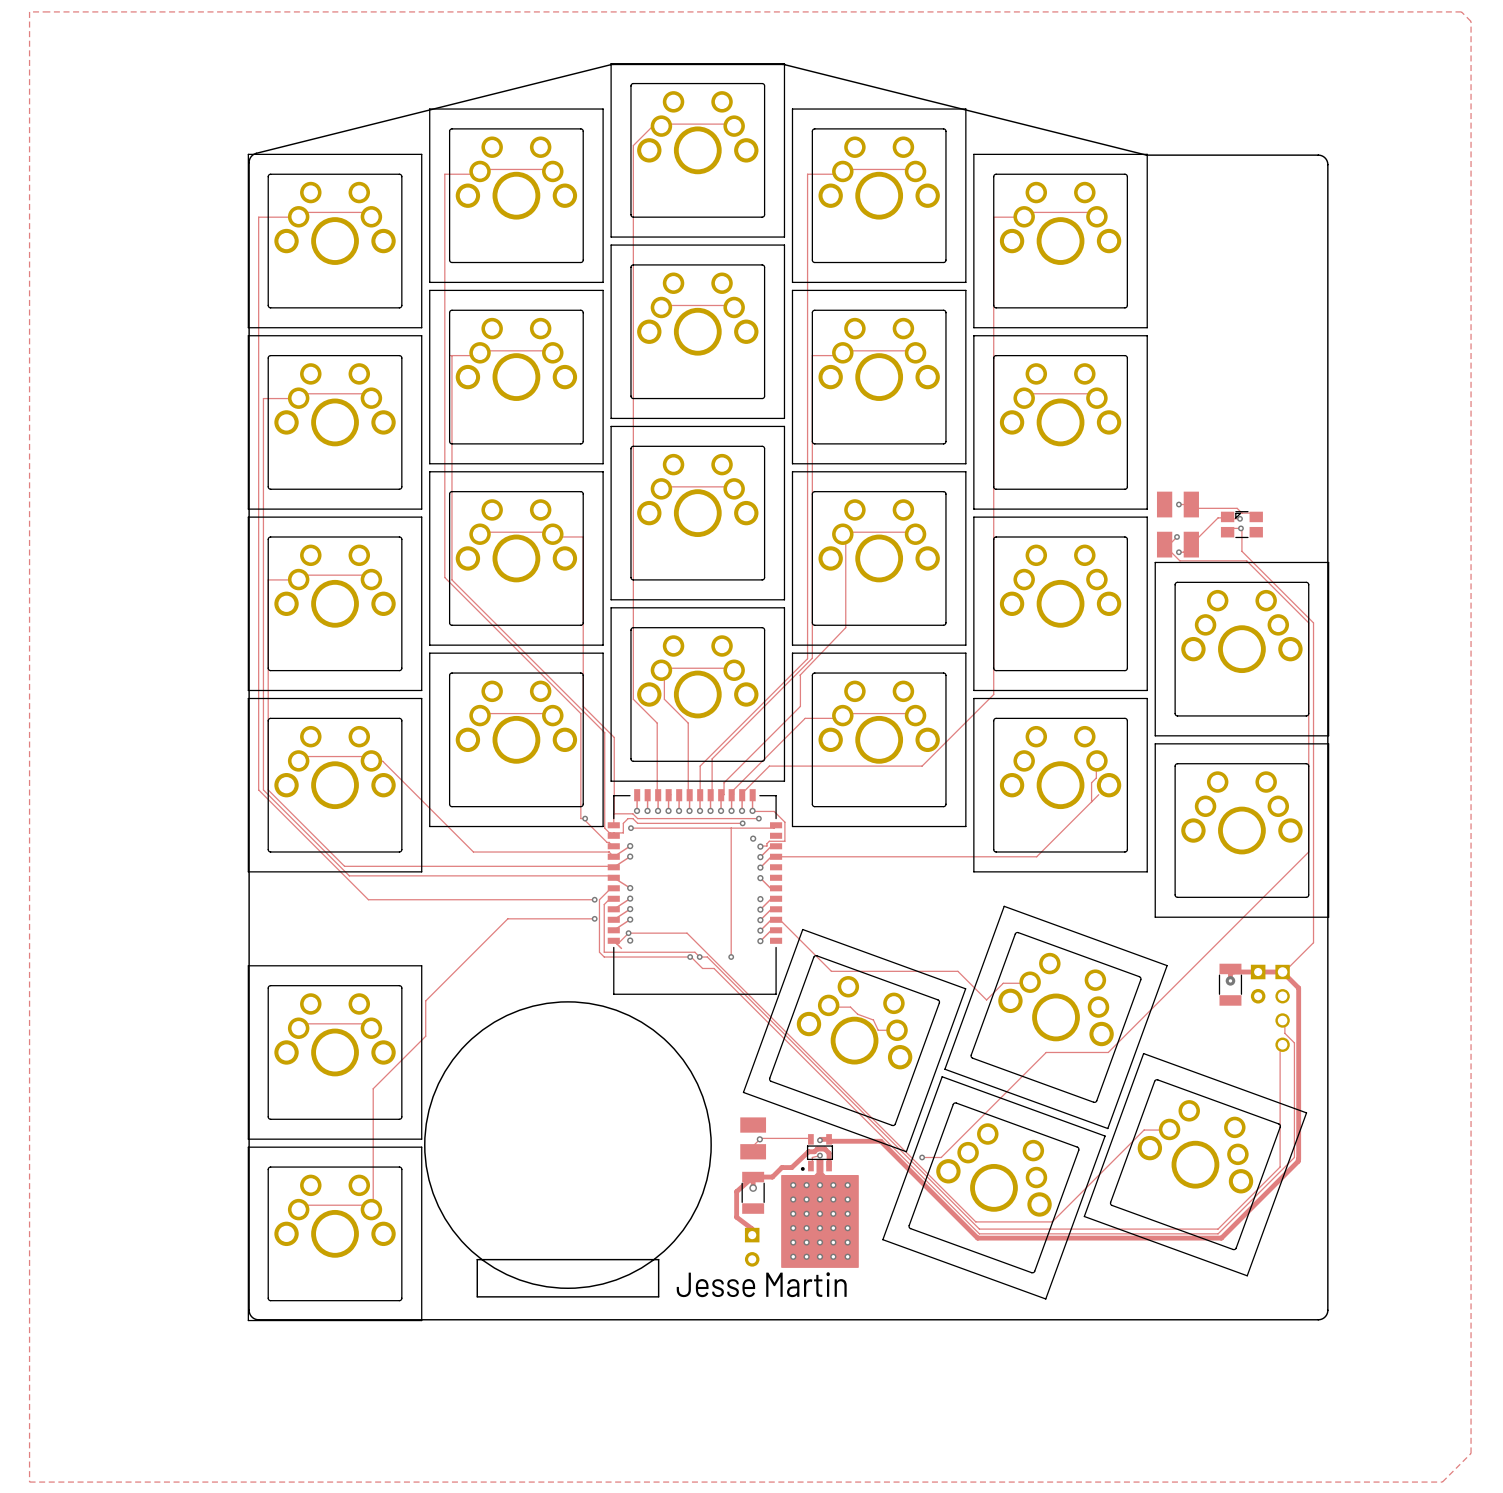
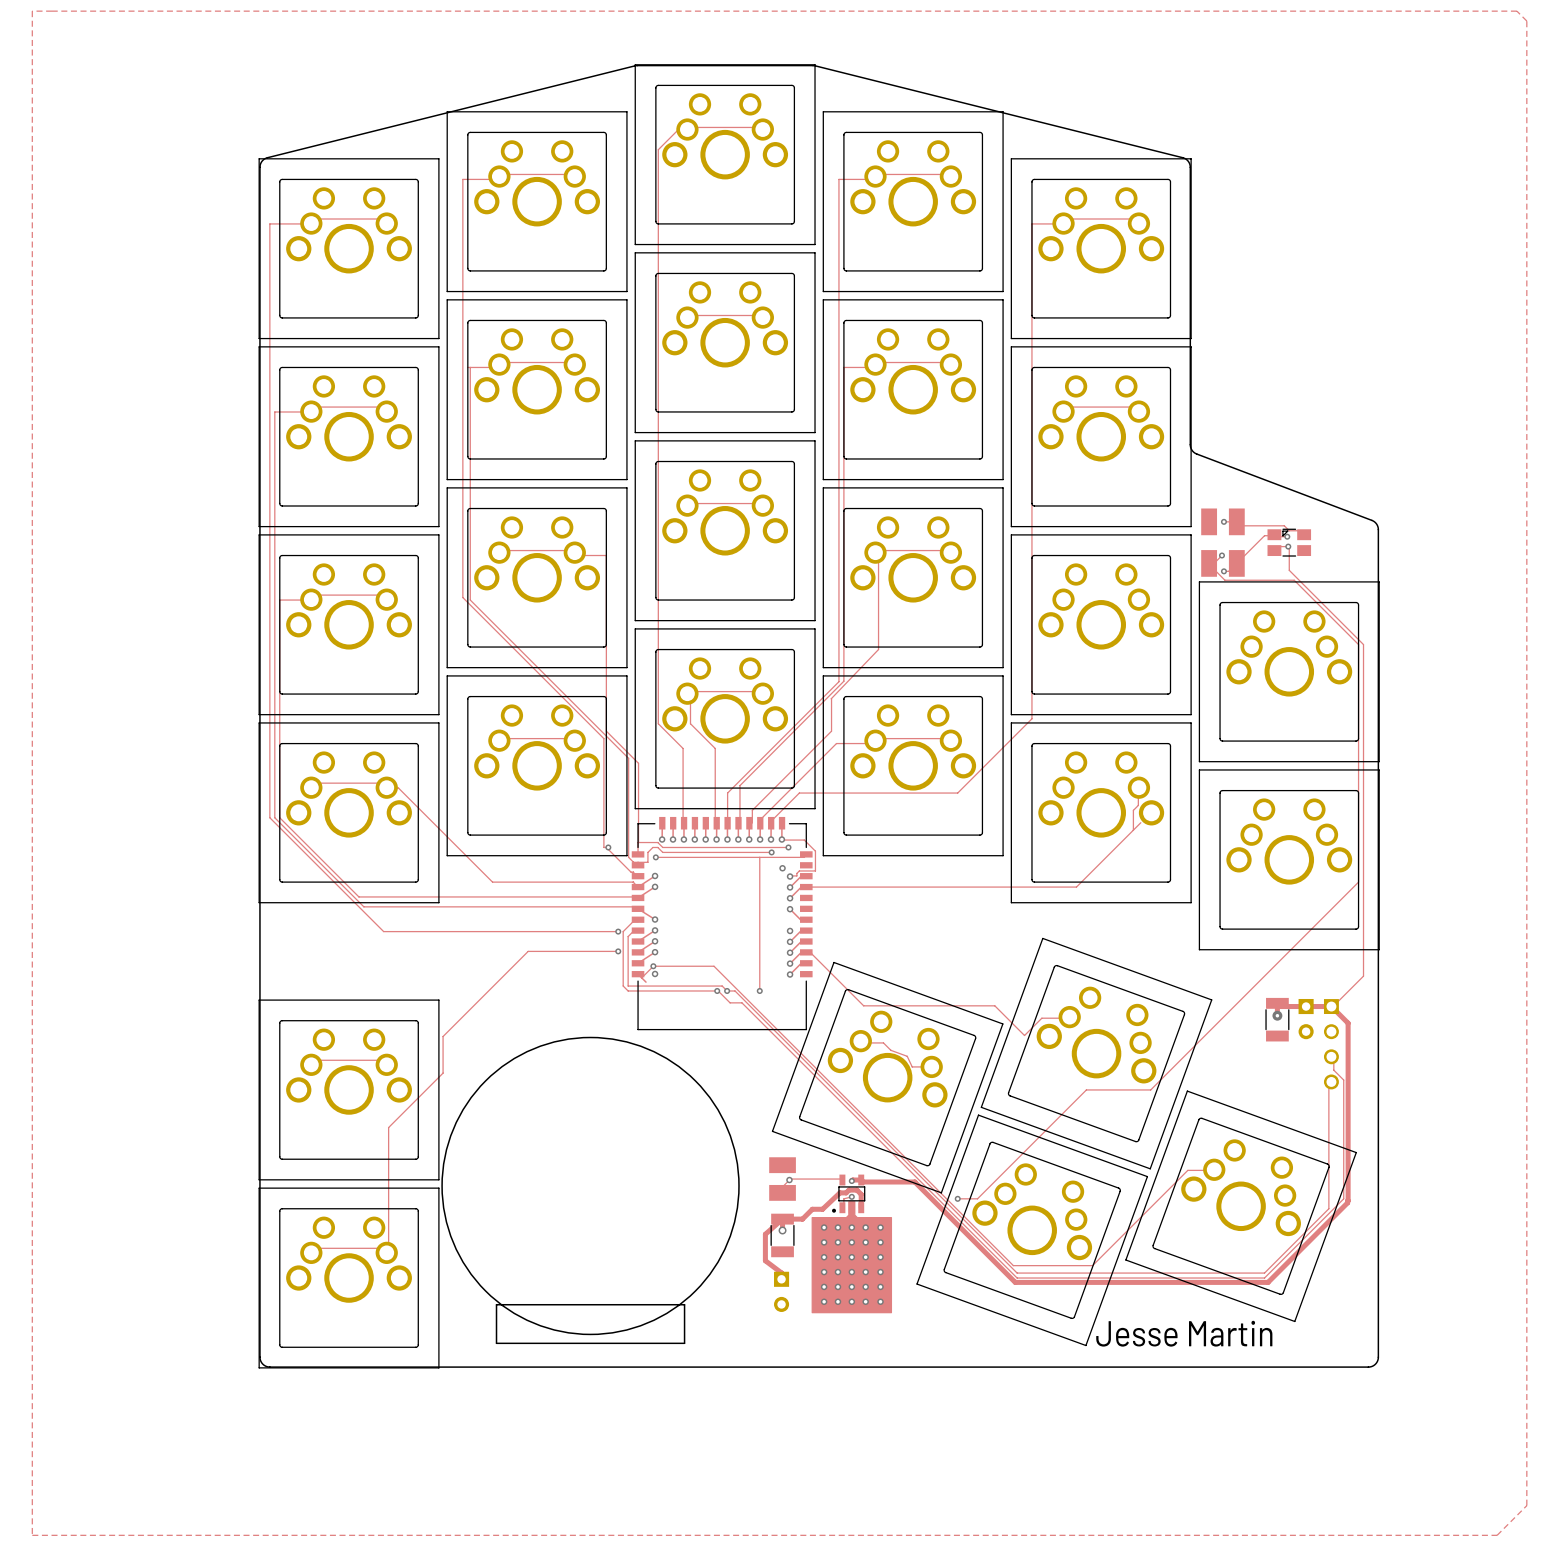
board edge: (1139, 153) (1146, 155) (1318, 155) (1326, 159) (1327, 512) -> (1182, 157) (1188, 161) (1190, 167) (1191, 449) (1196, 454) (1371, 520) (1376, 524) (1378, 529)
text: Jesse Martin (761, 1284) -> none
text: none -> Jesse Martin (1184, 1333)

